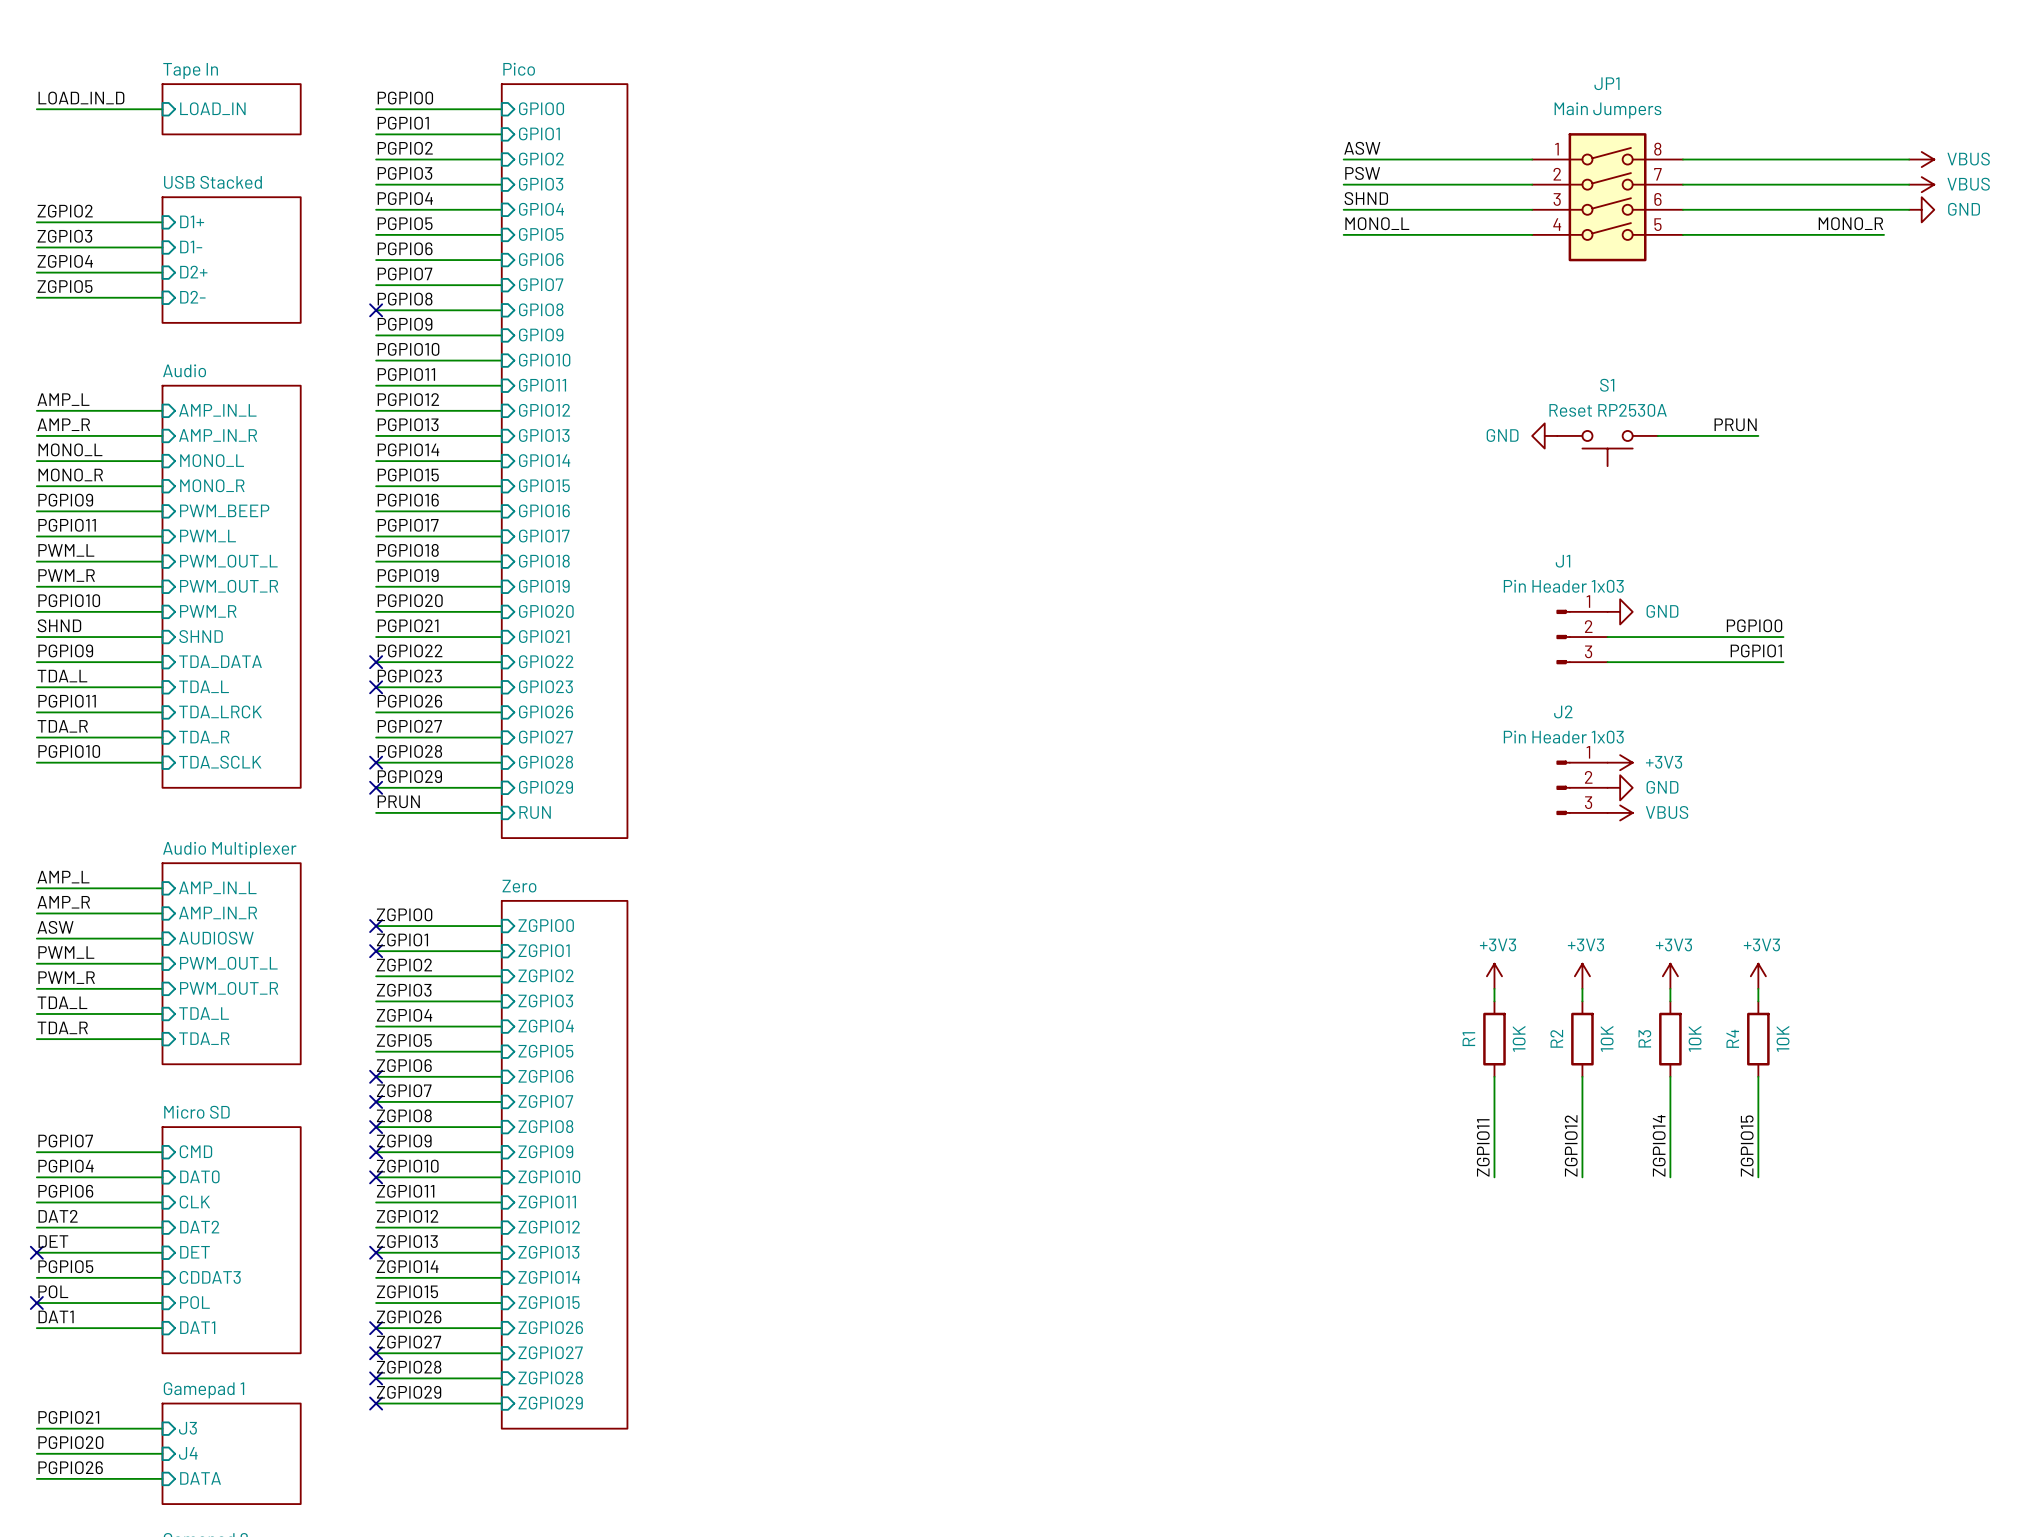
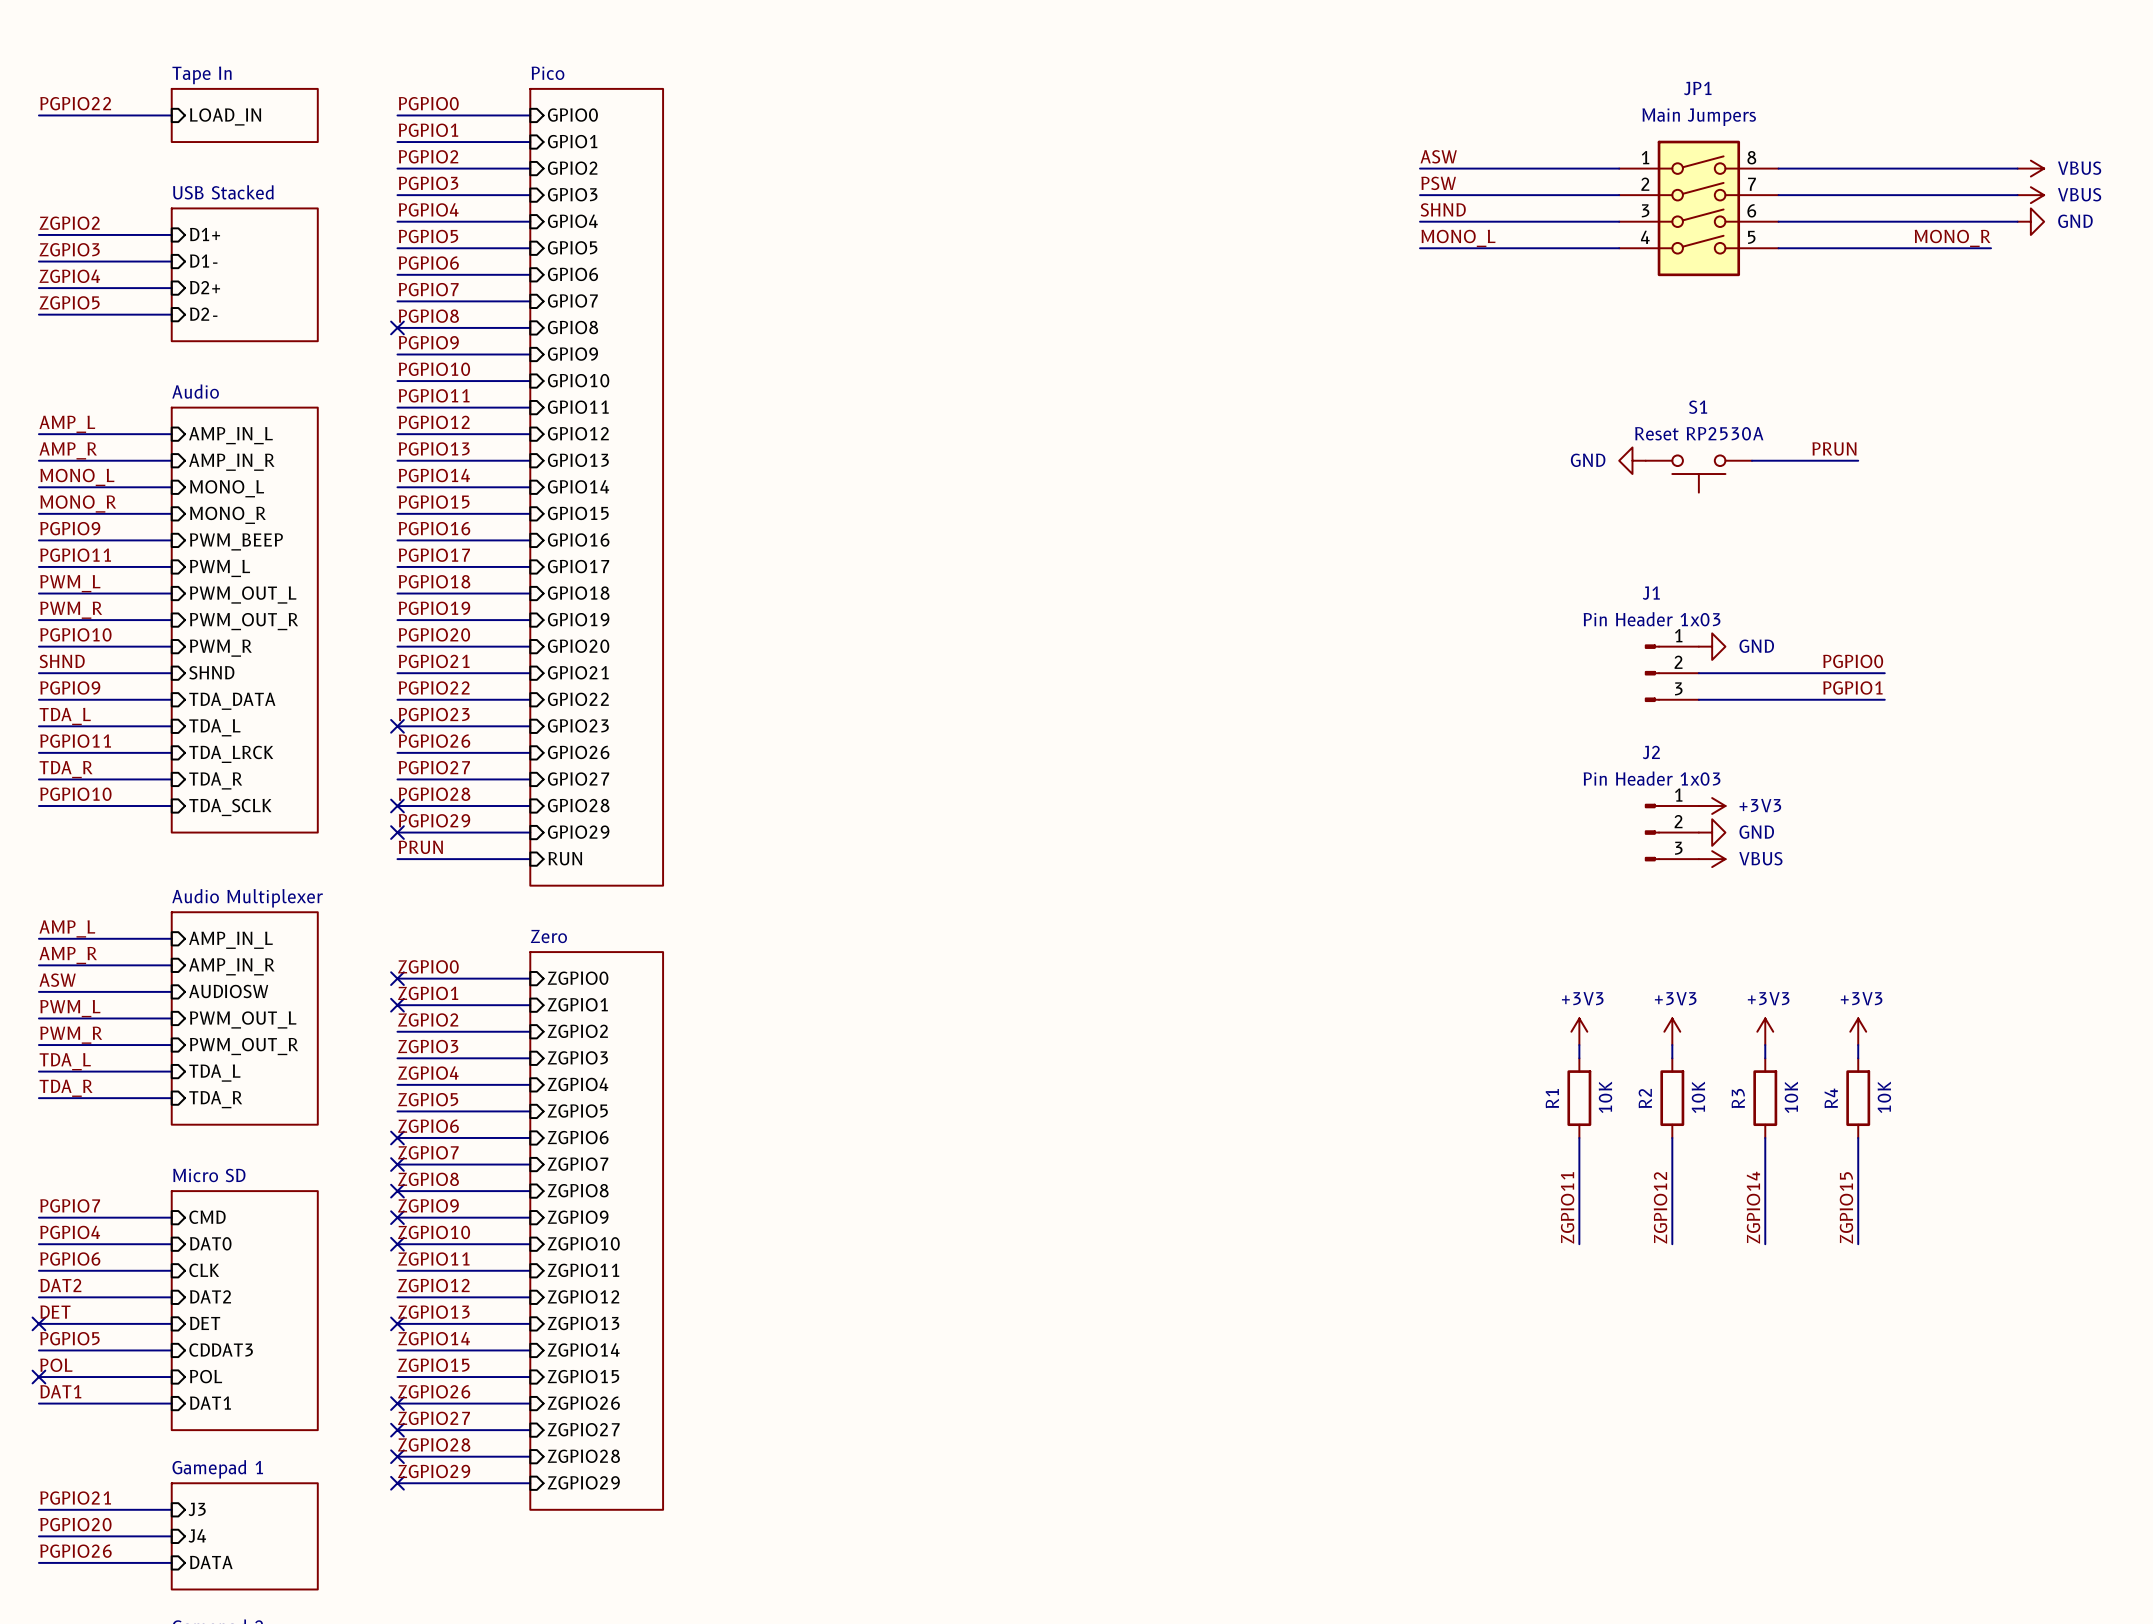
label: LOAD_IN_D (81, 98) -> PGPIO22 (75, 103)
no-connect mark: (376, 662) -> none

